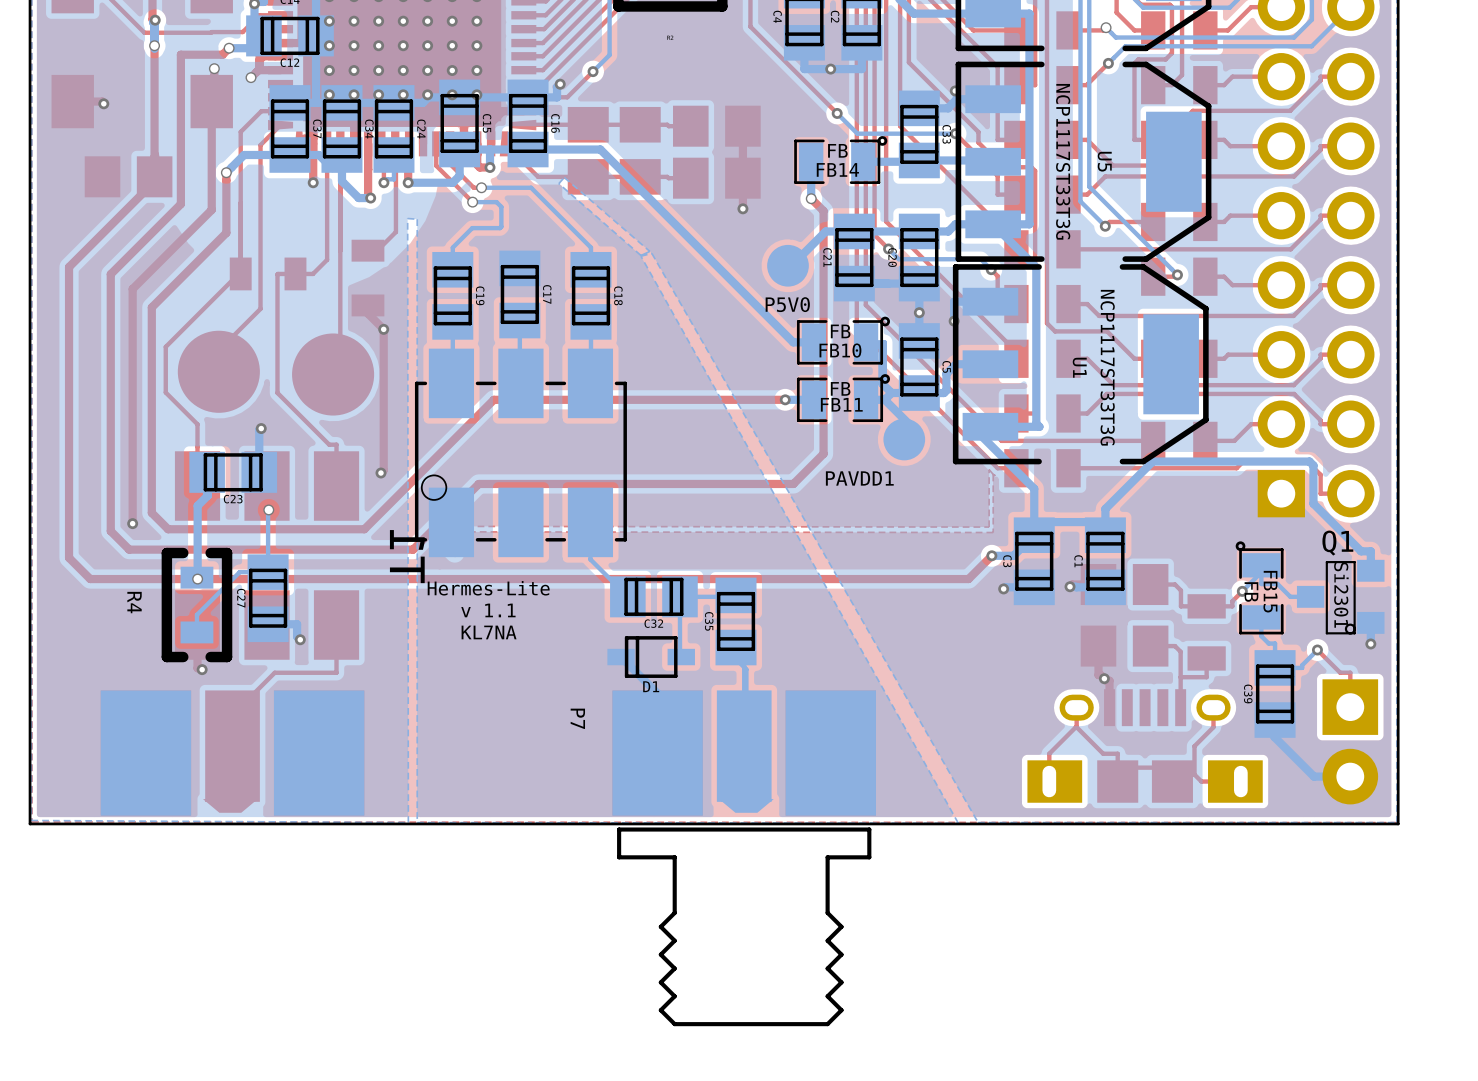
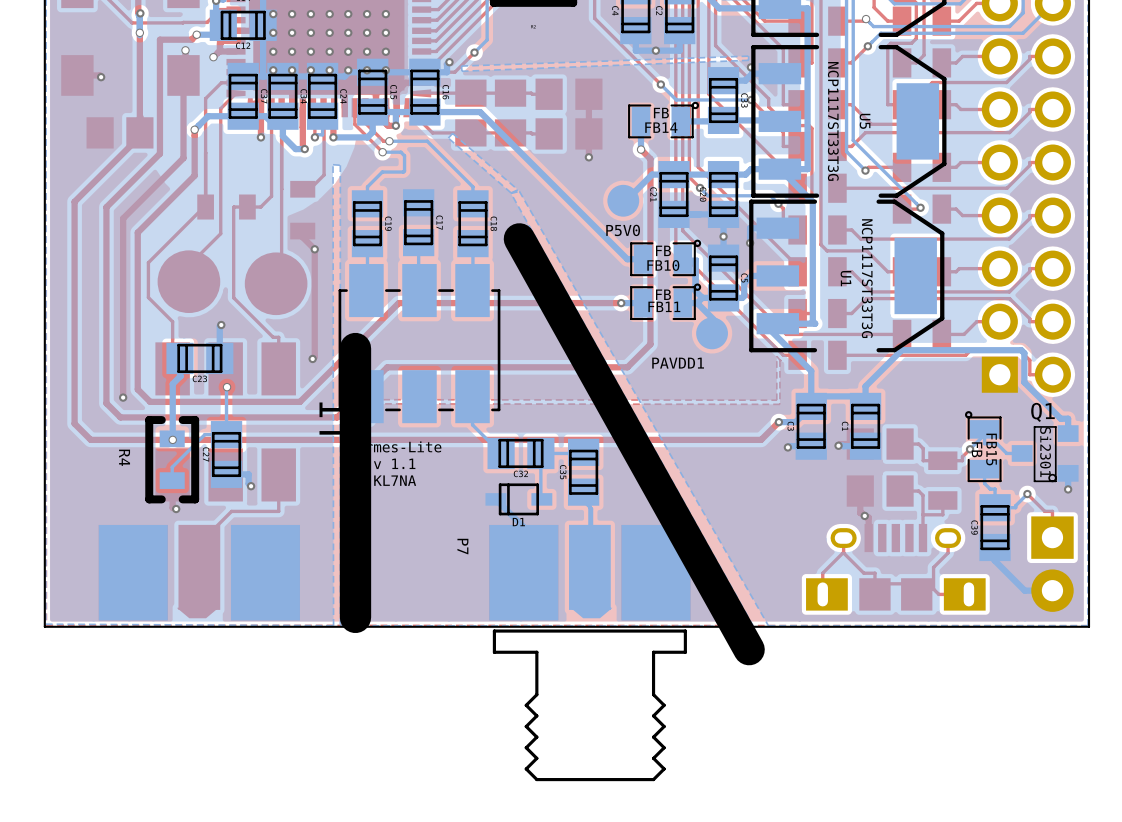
bottom zone outline: none -> (748, 56) (461, 66) (461, 71) (748, 60) (748, 56)
line: none -> (519, 238) (749, 649)
line: none -> (355, 348) (355, 617)

